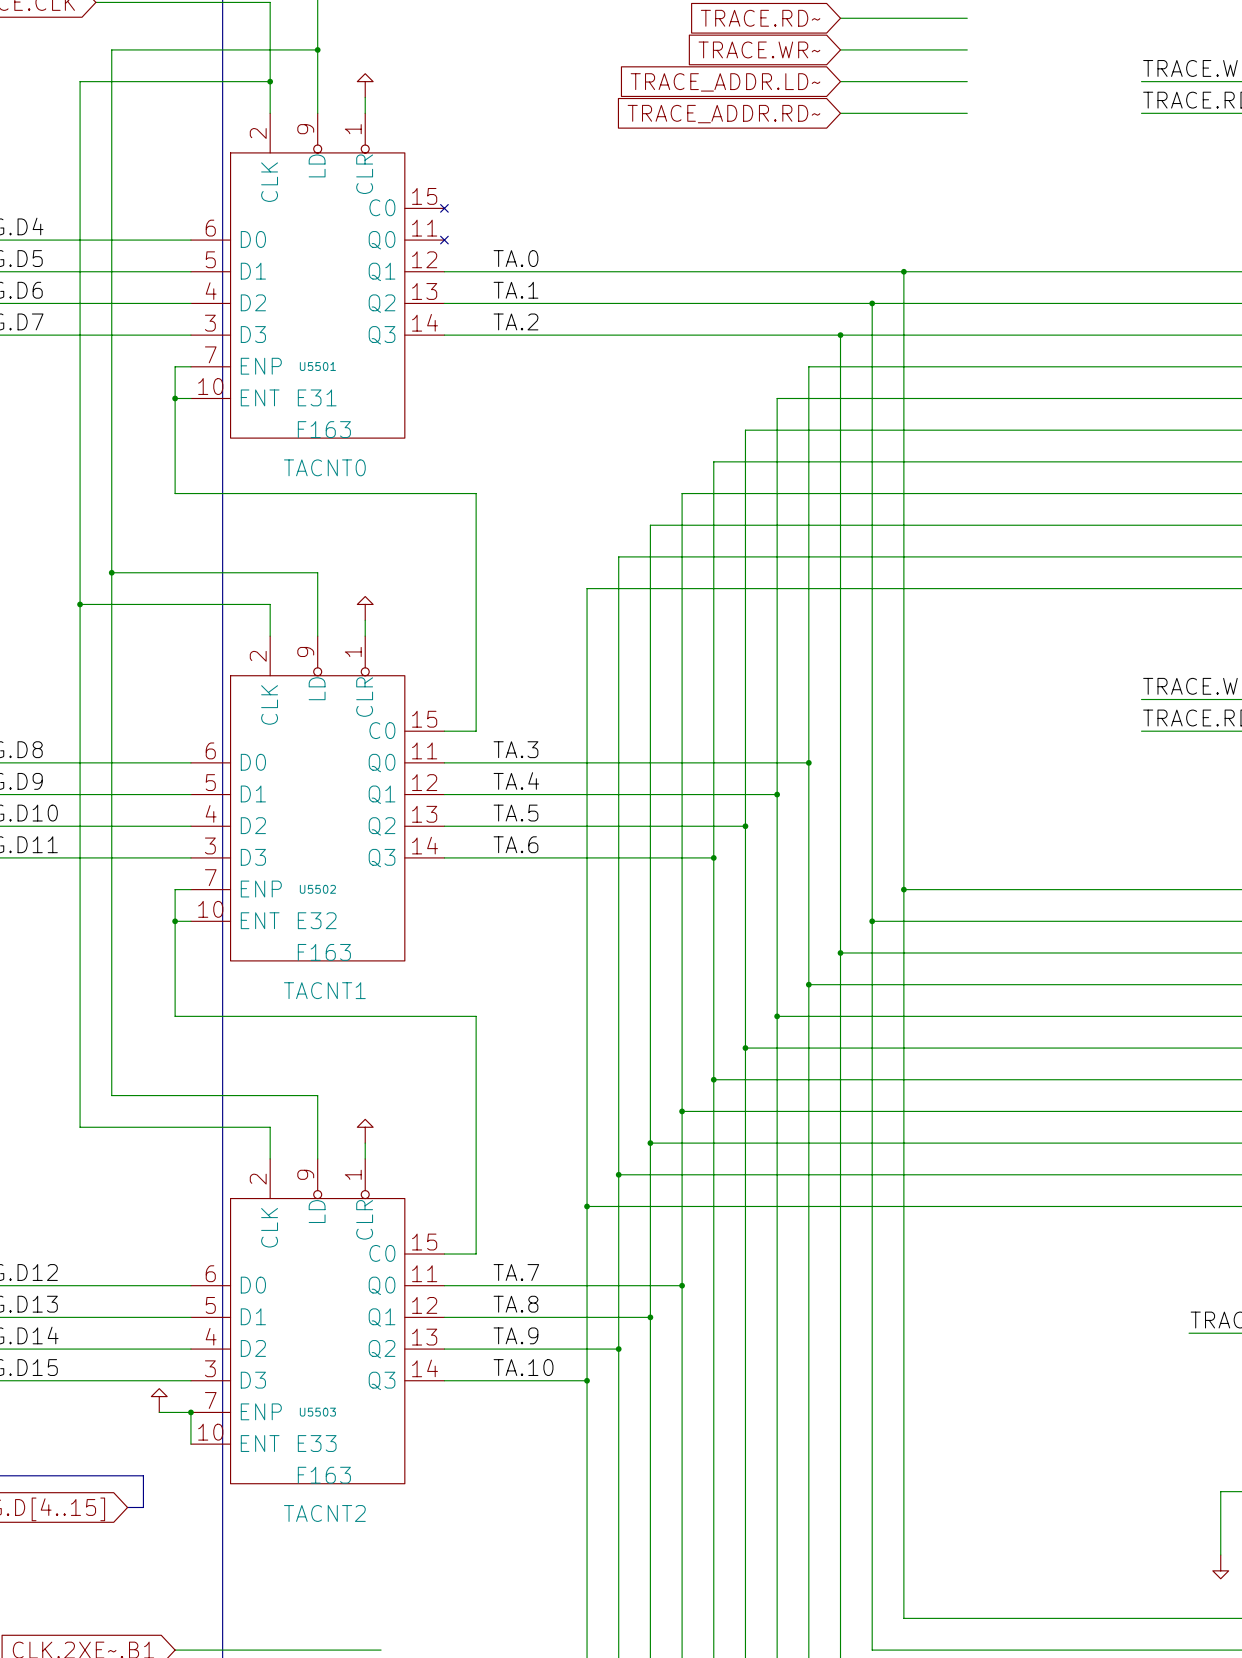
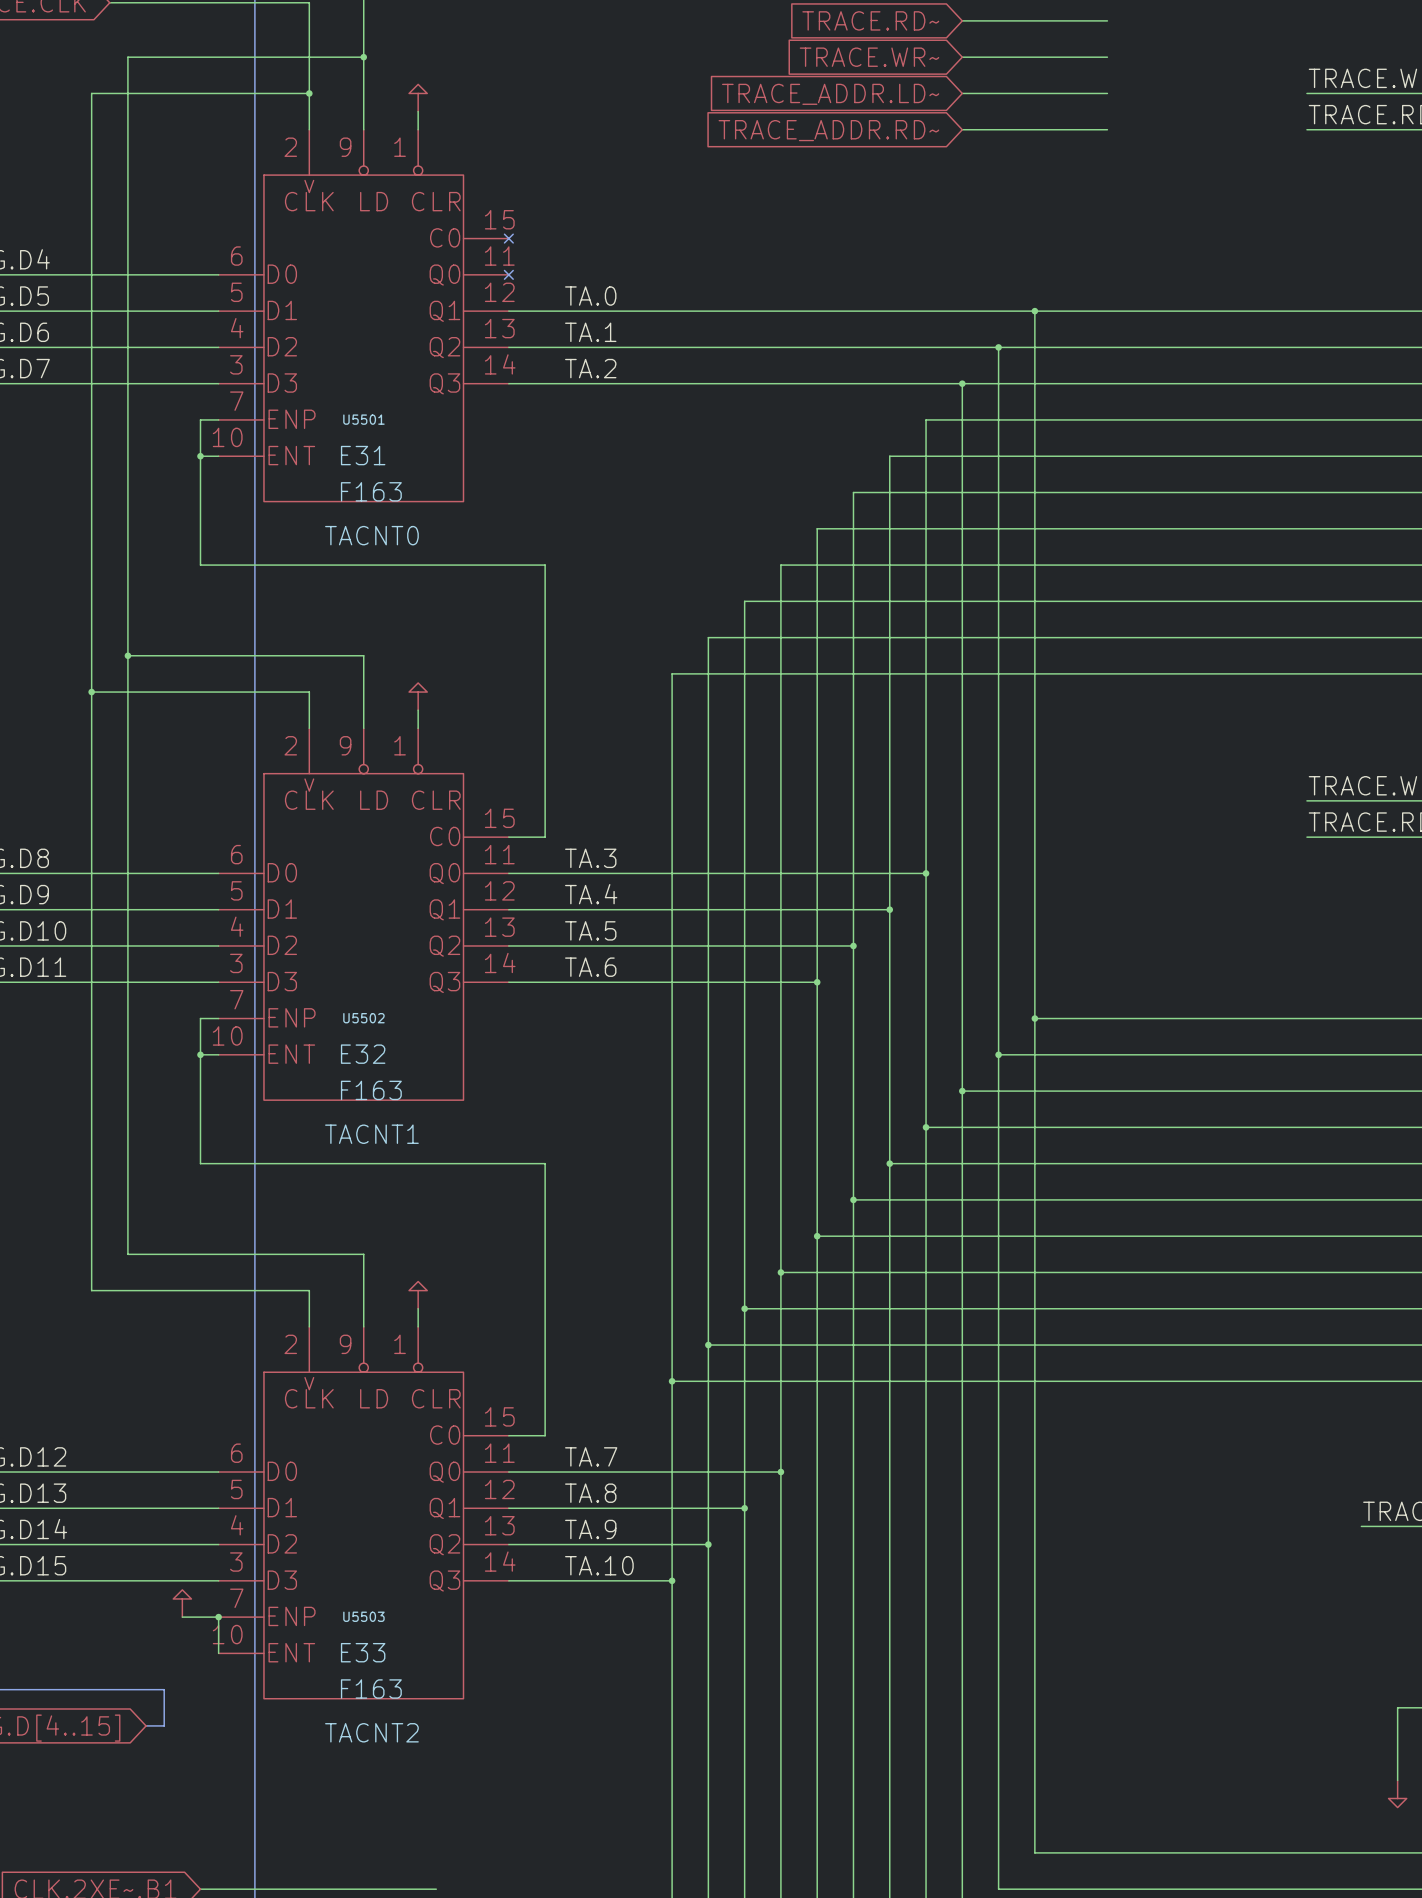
U5501 symbol: [190, 113, 445, 439] -> [218, 129, 509, 502]
U5502 symbol: [190, 636, 445, 961] -> [218, 728, 509, 1101]
U5503 symbol: [190, 1158, 445, 1484] -> [218, 1326, 509, 1699]

